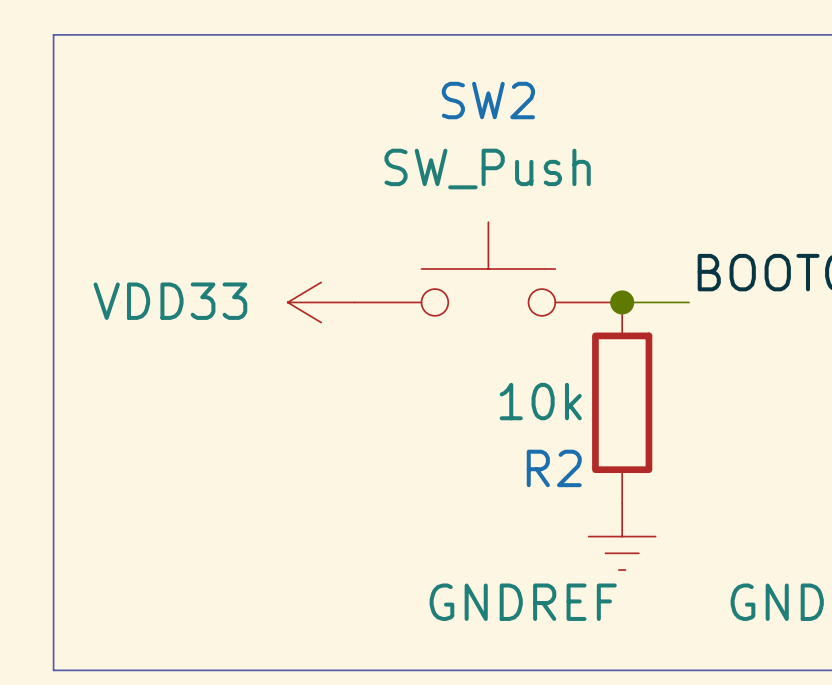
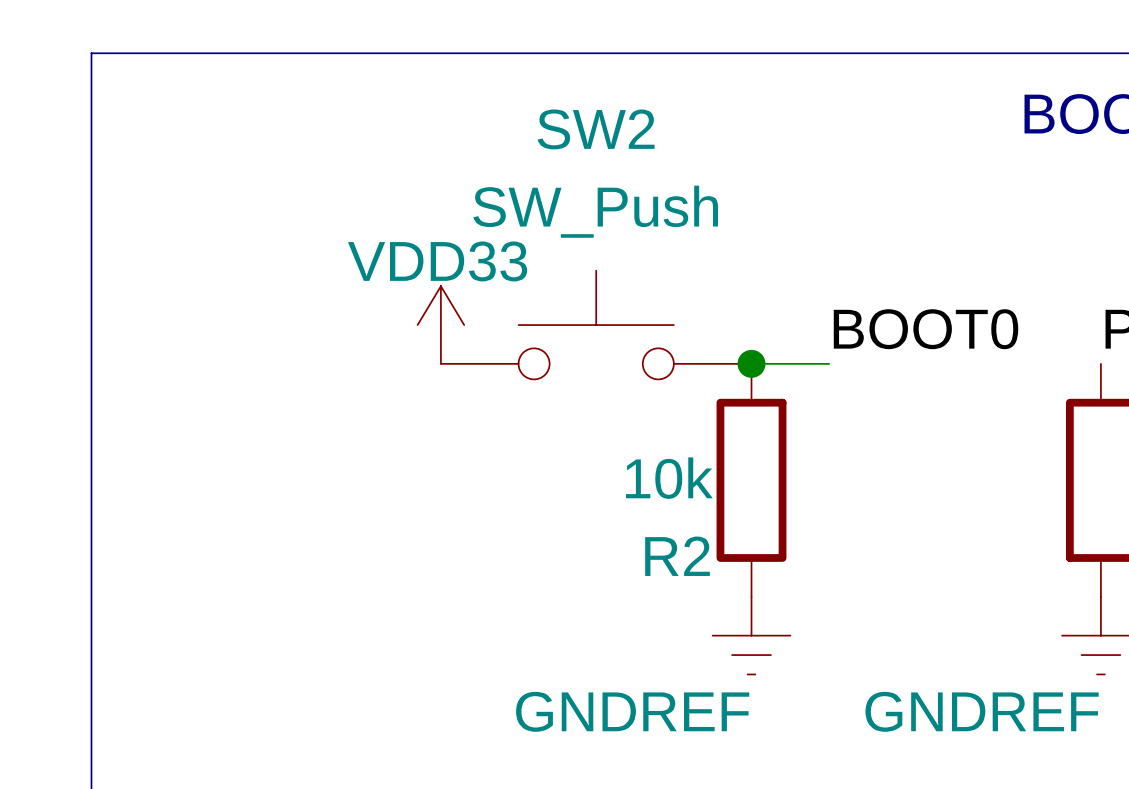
power symbol text position: VDD33 (170, 301) -> VDD33 (437, 261)
power symbol rotation: 0° (321, 302) -> 90° clockwise (440, 325)
power symbol position: VDD33 (321, 302) -> VDD33 (440, 325)

